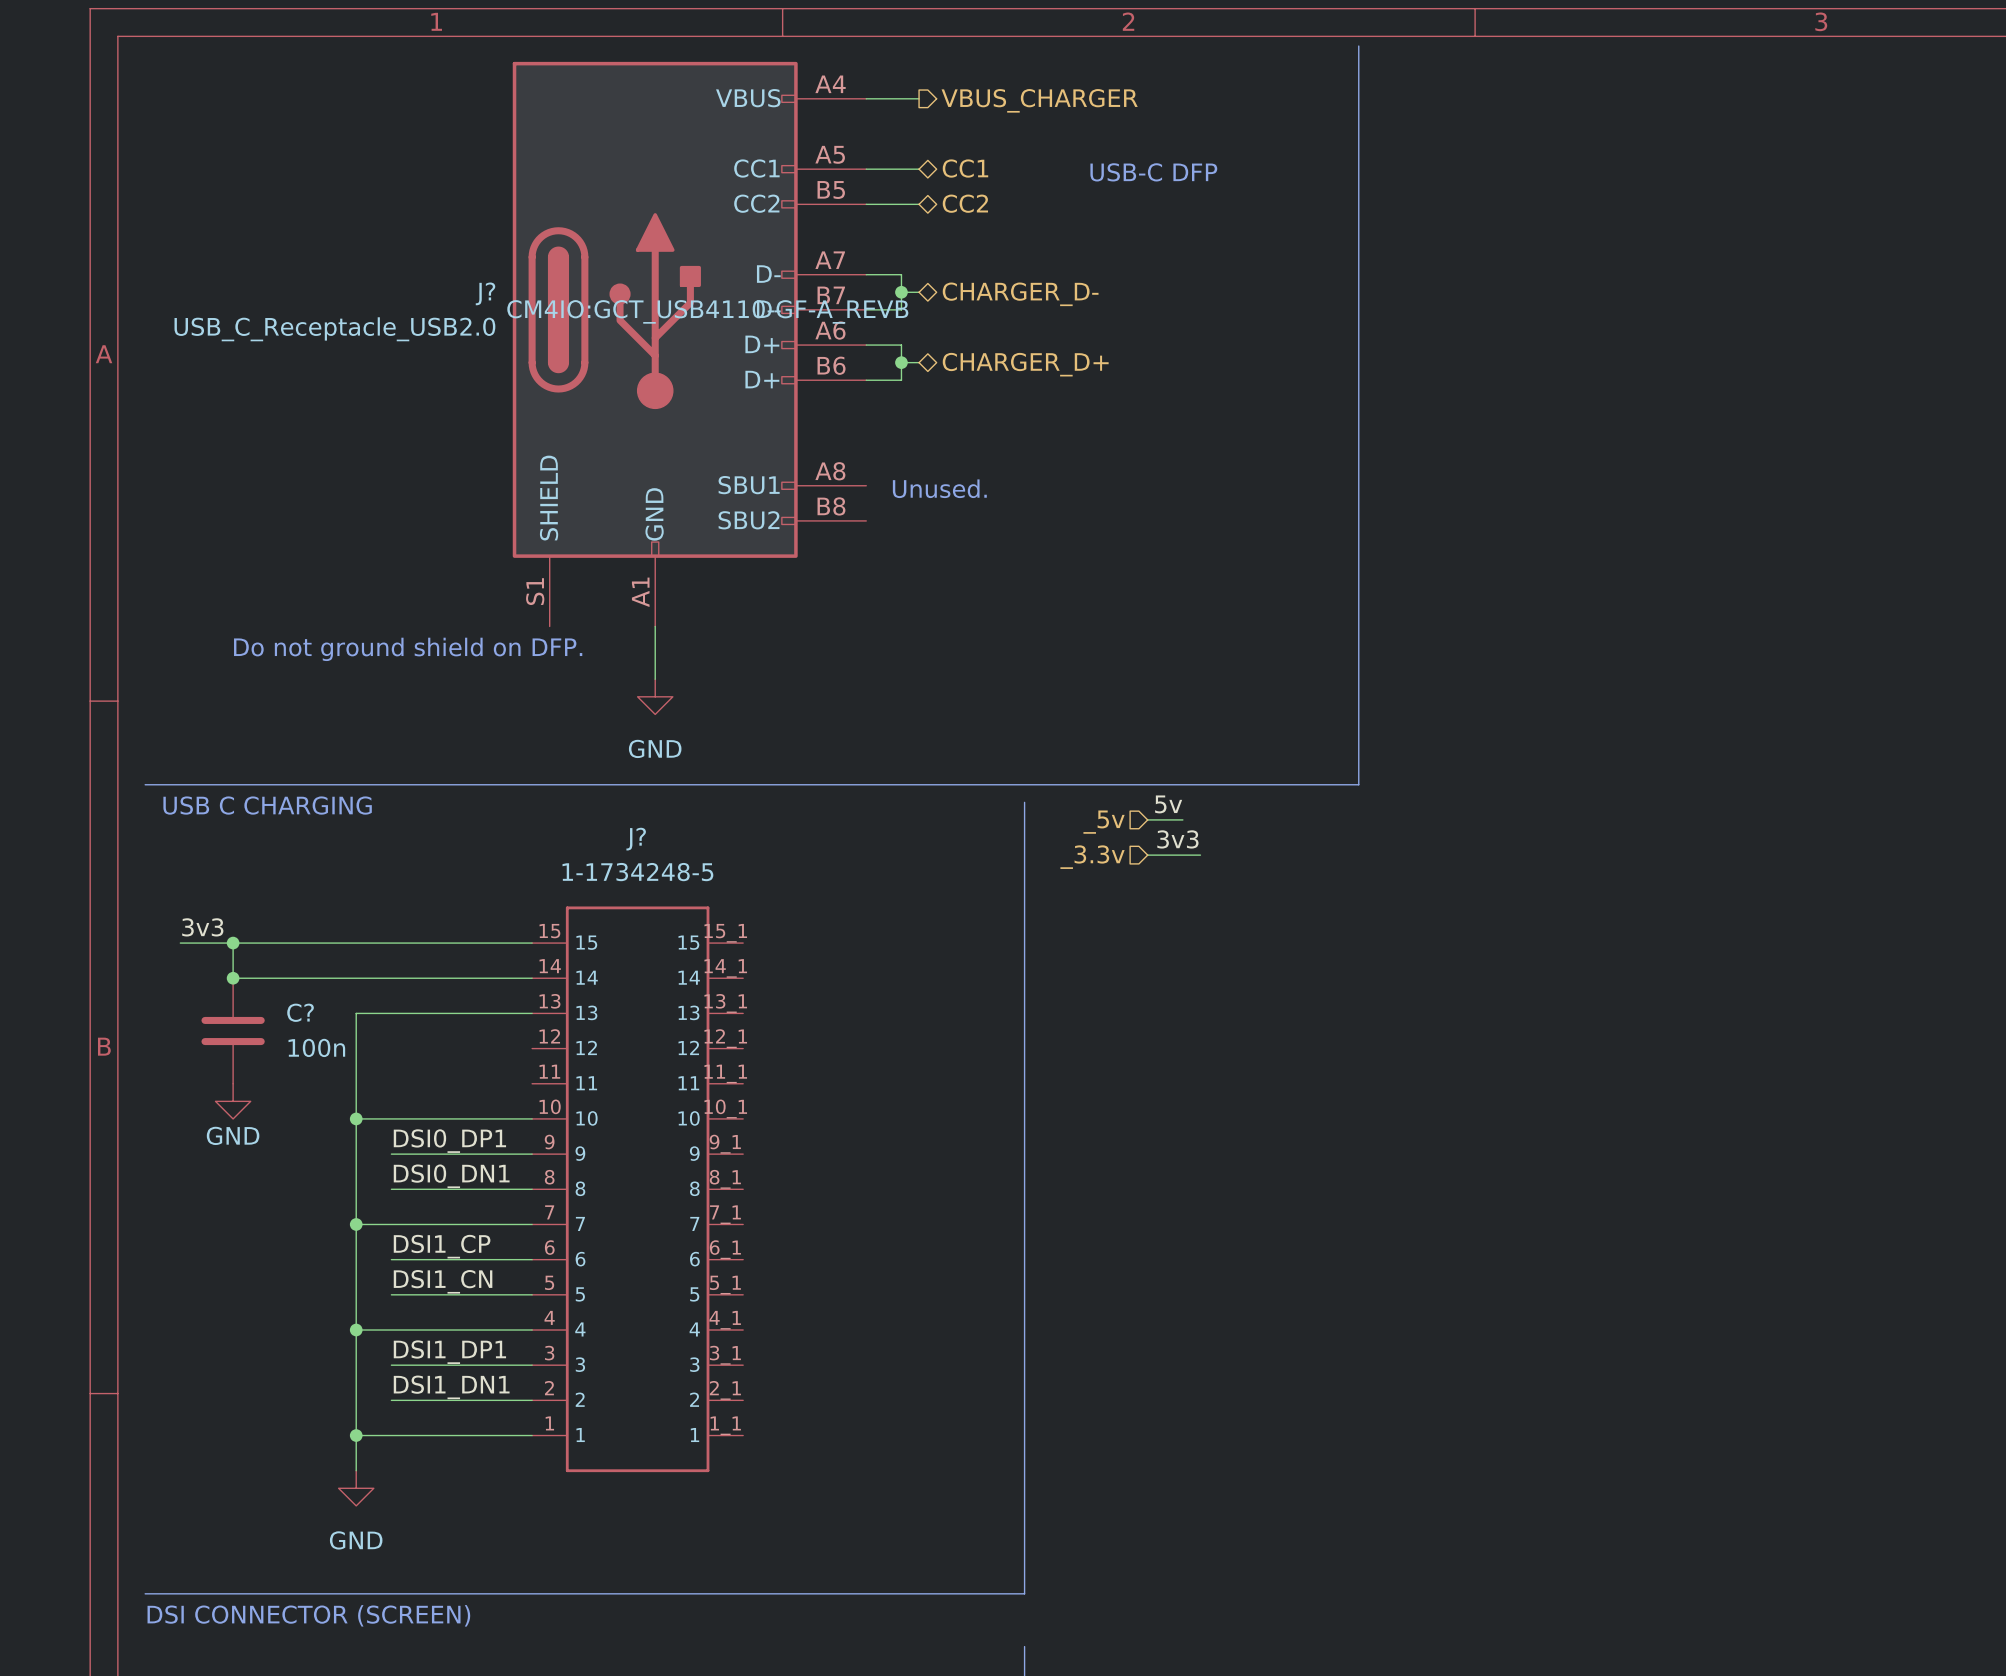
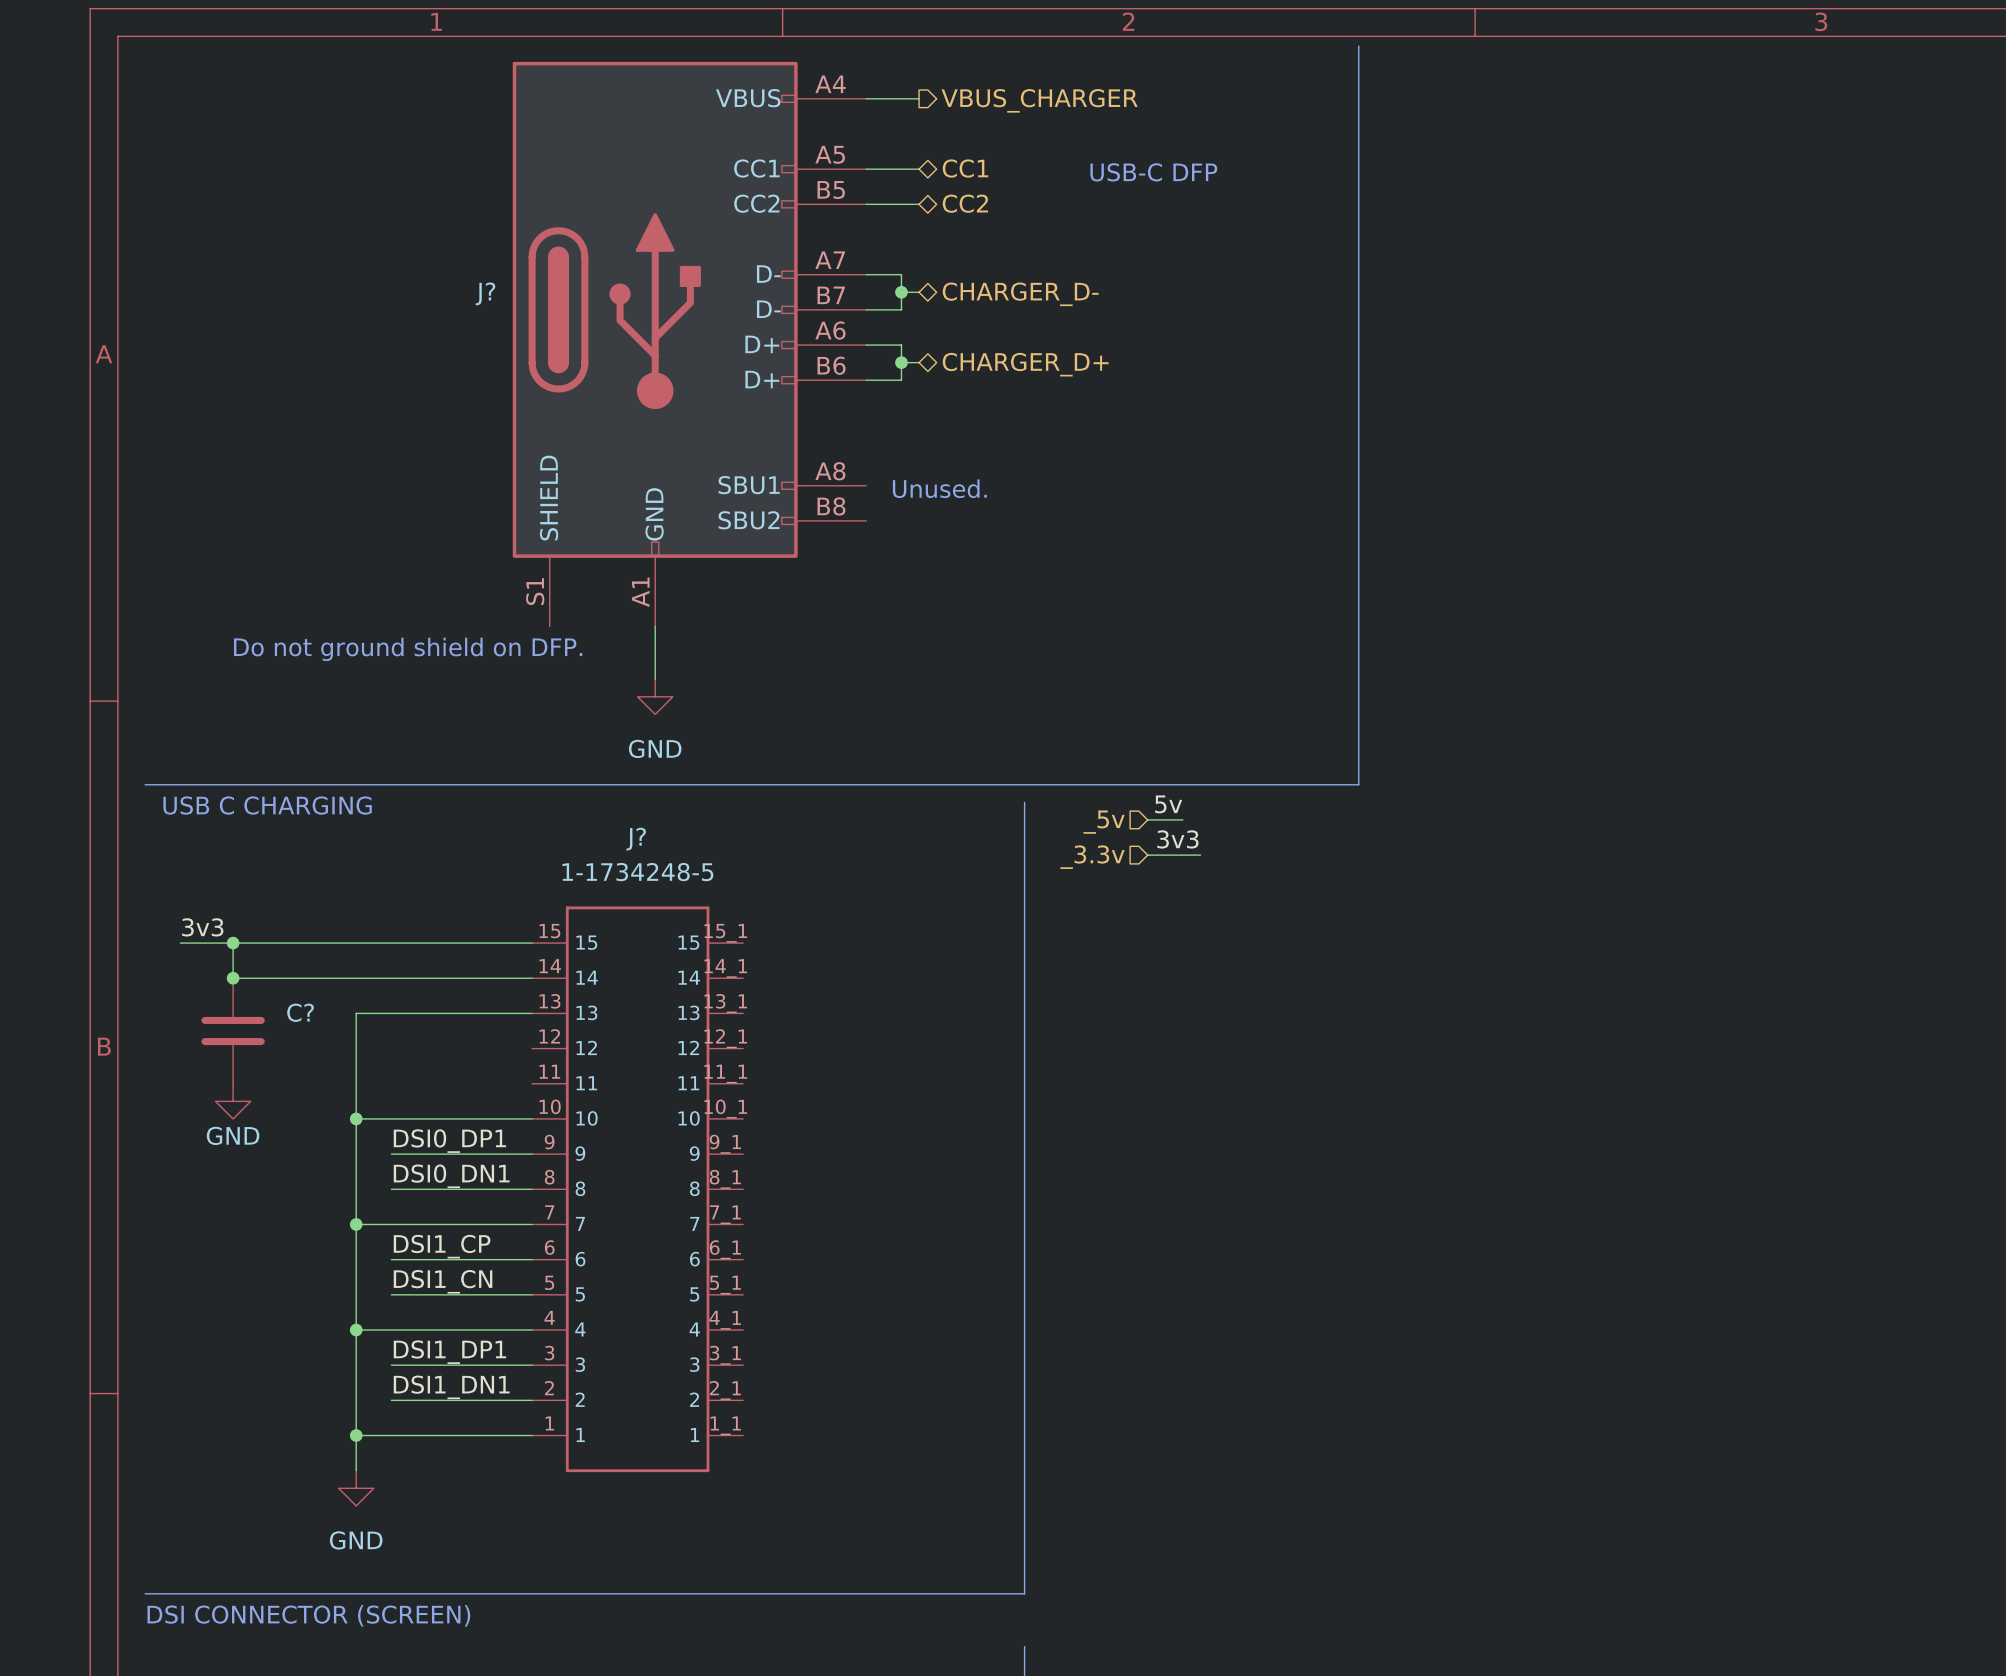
J? text: CM4IO:GCT_USB4110-GF-A_REVB (707, 311) -> none
J? value: USB_C_Receptacle_USB2.0 (334, 329) -> none
C? value: 100n (316, 1047) -> none

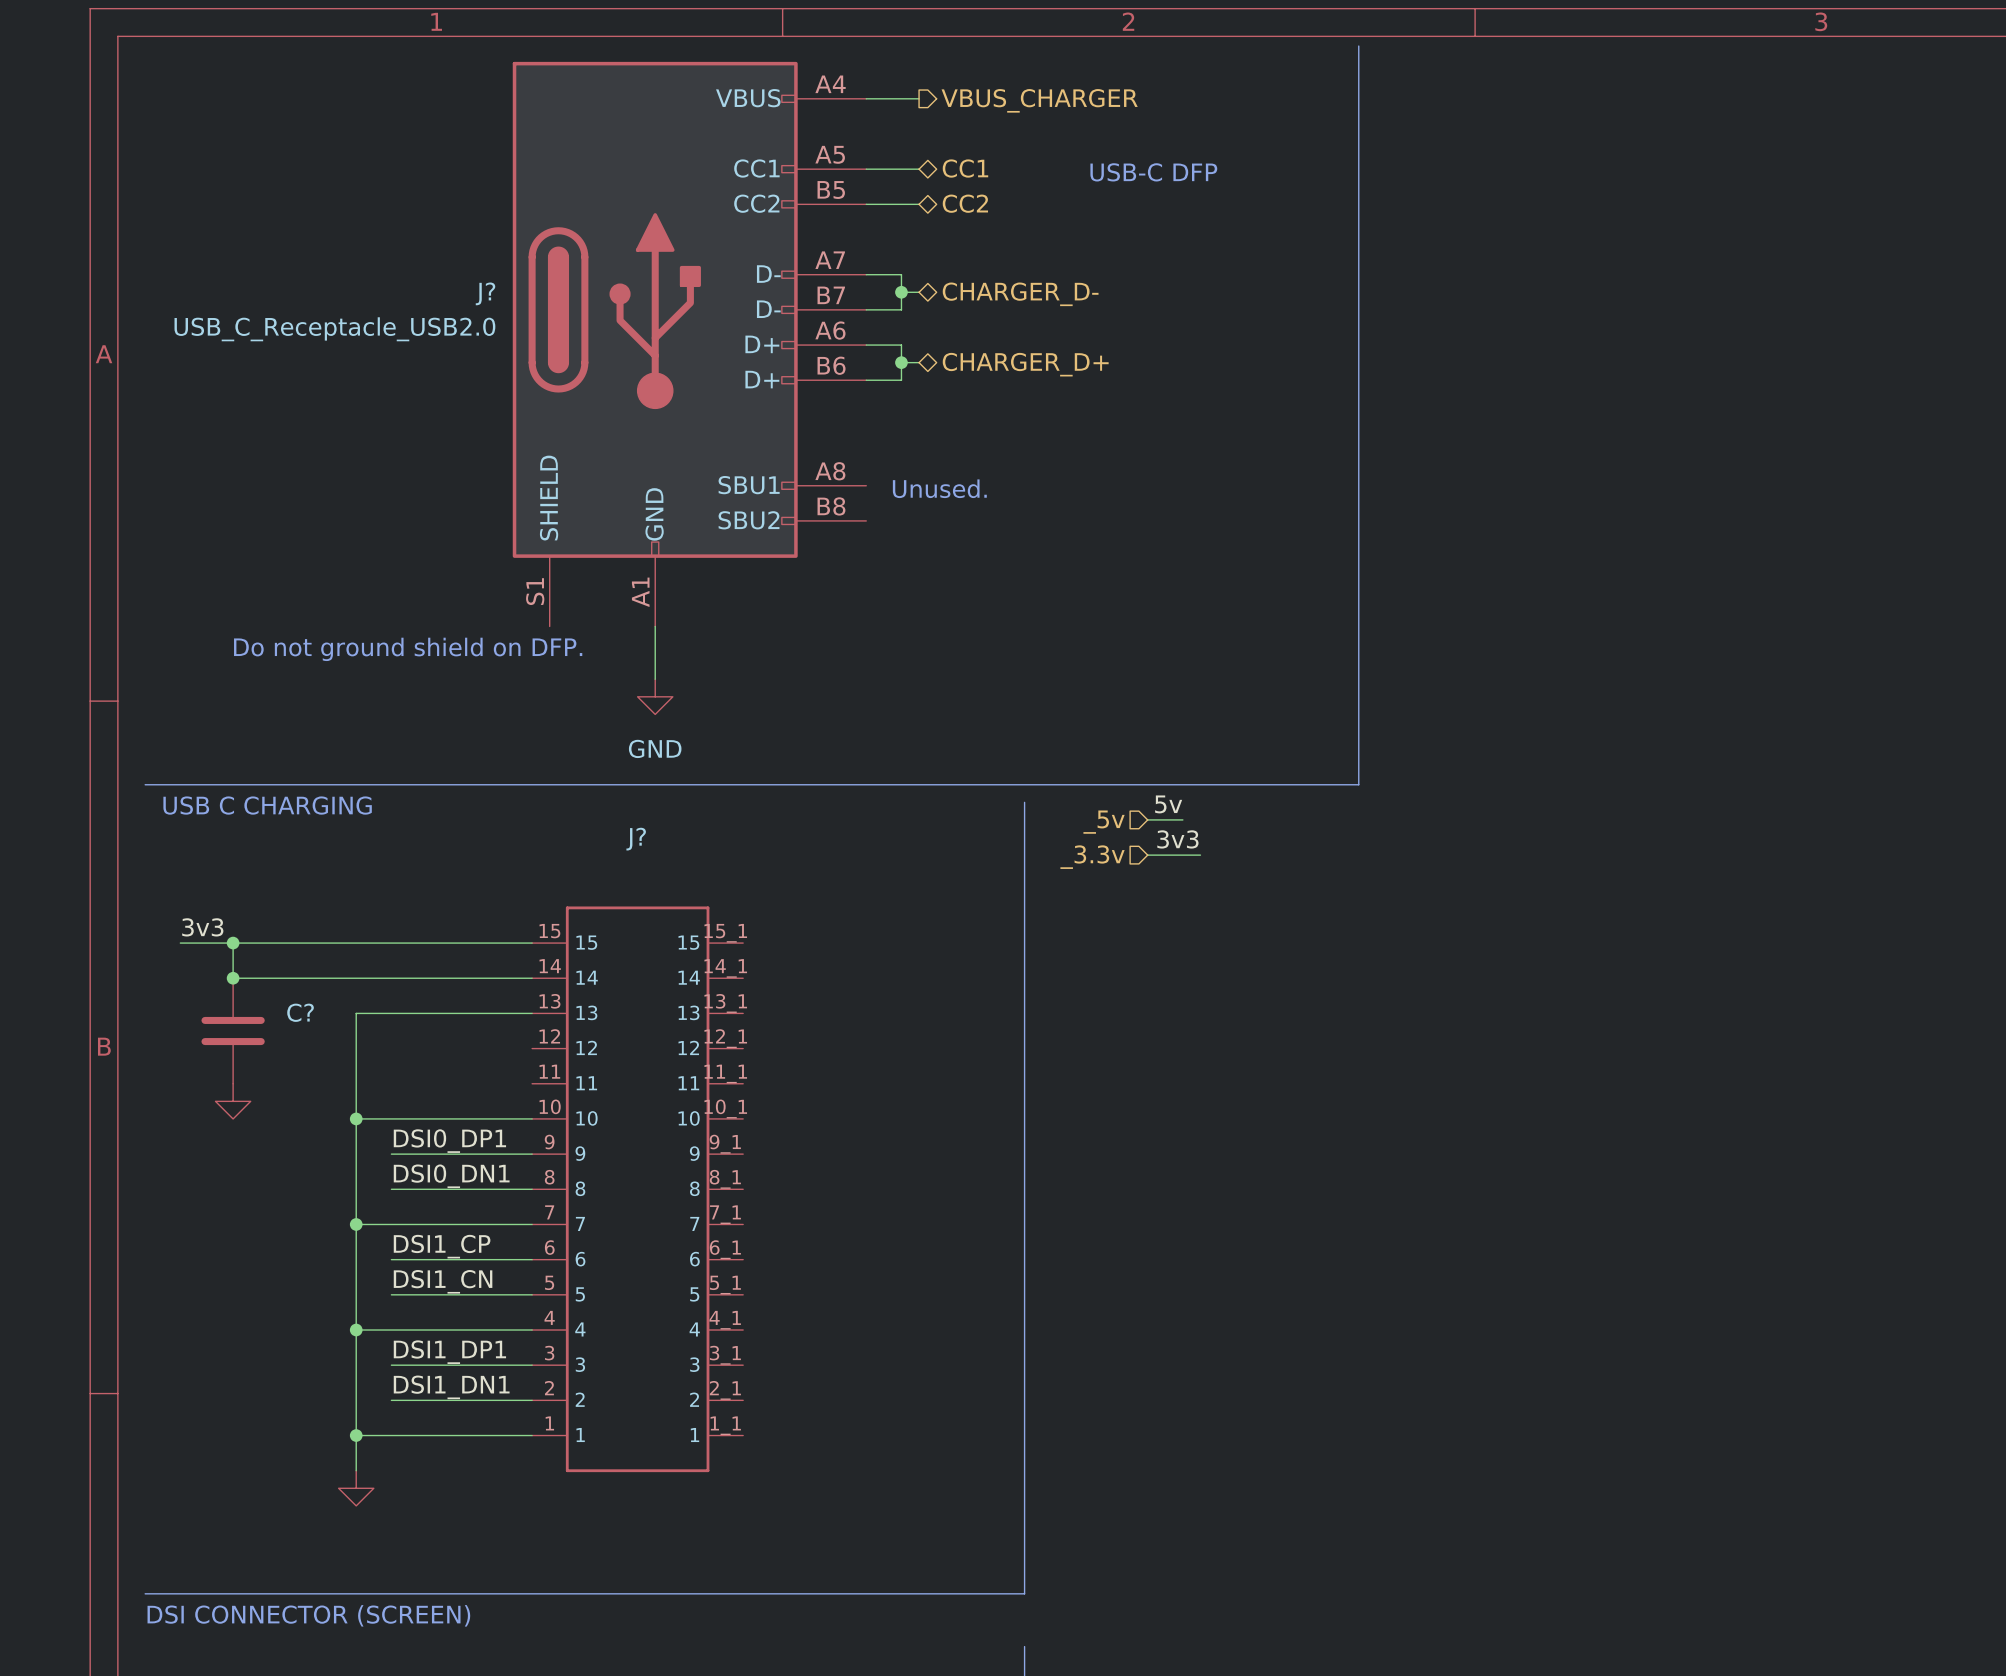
J? value: none -> USB_C_Receptacle_USB2.0 (334, 329)
J? value: 1-1734248-5 (637, 872) -> none
power symbol text: GND (233, 1135) -> none
power symbol text: GND (356, 1540) -> none

